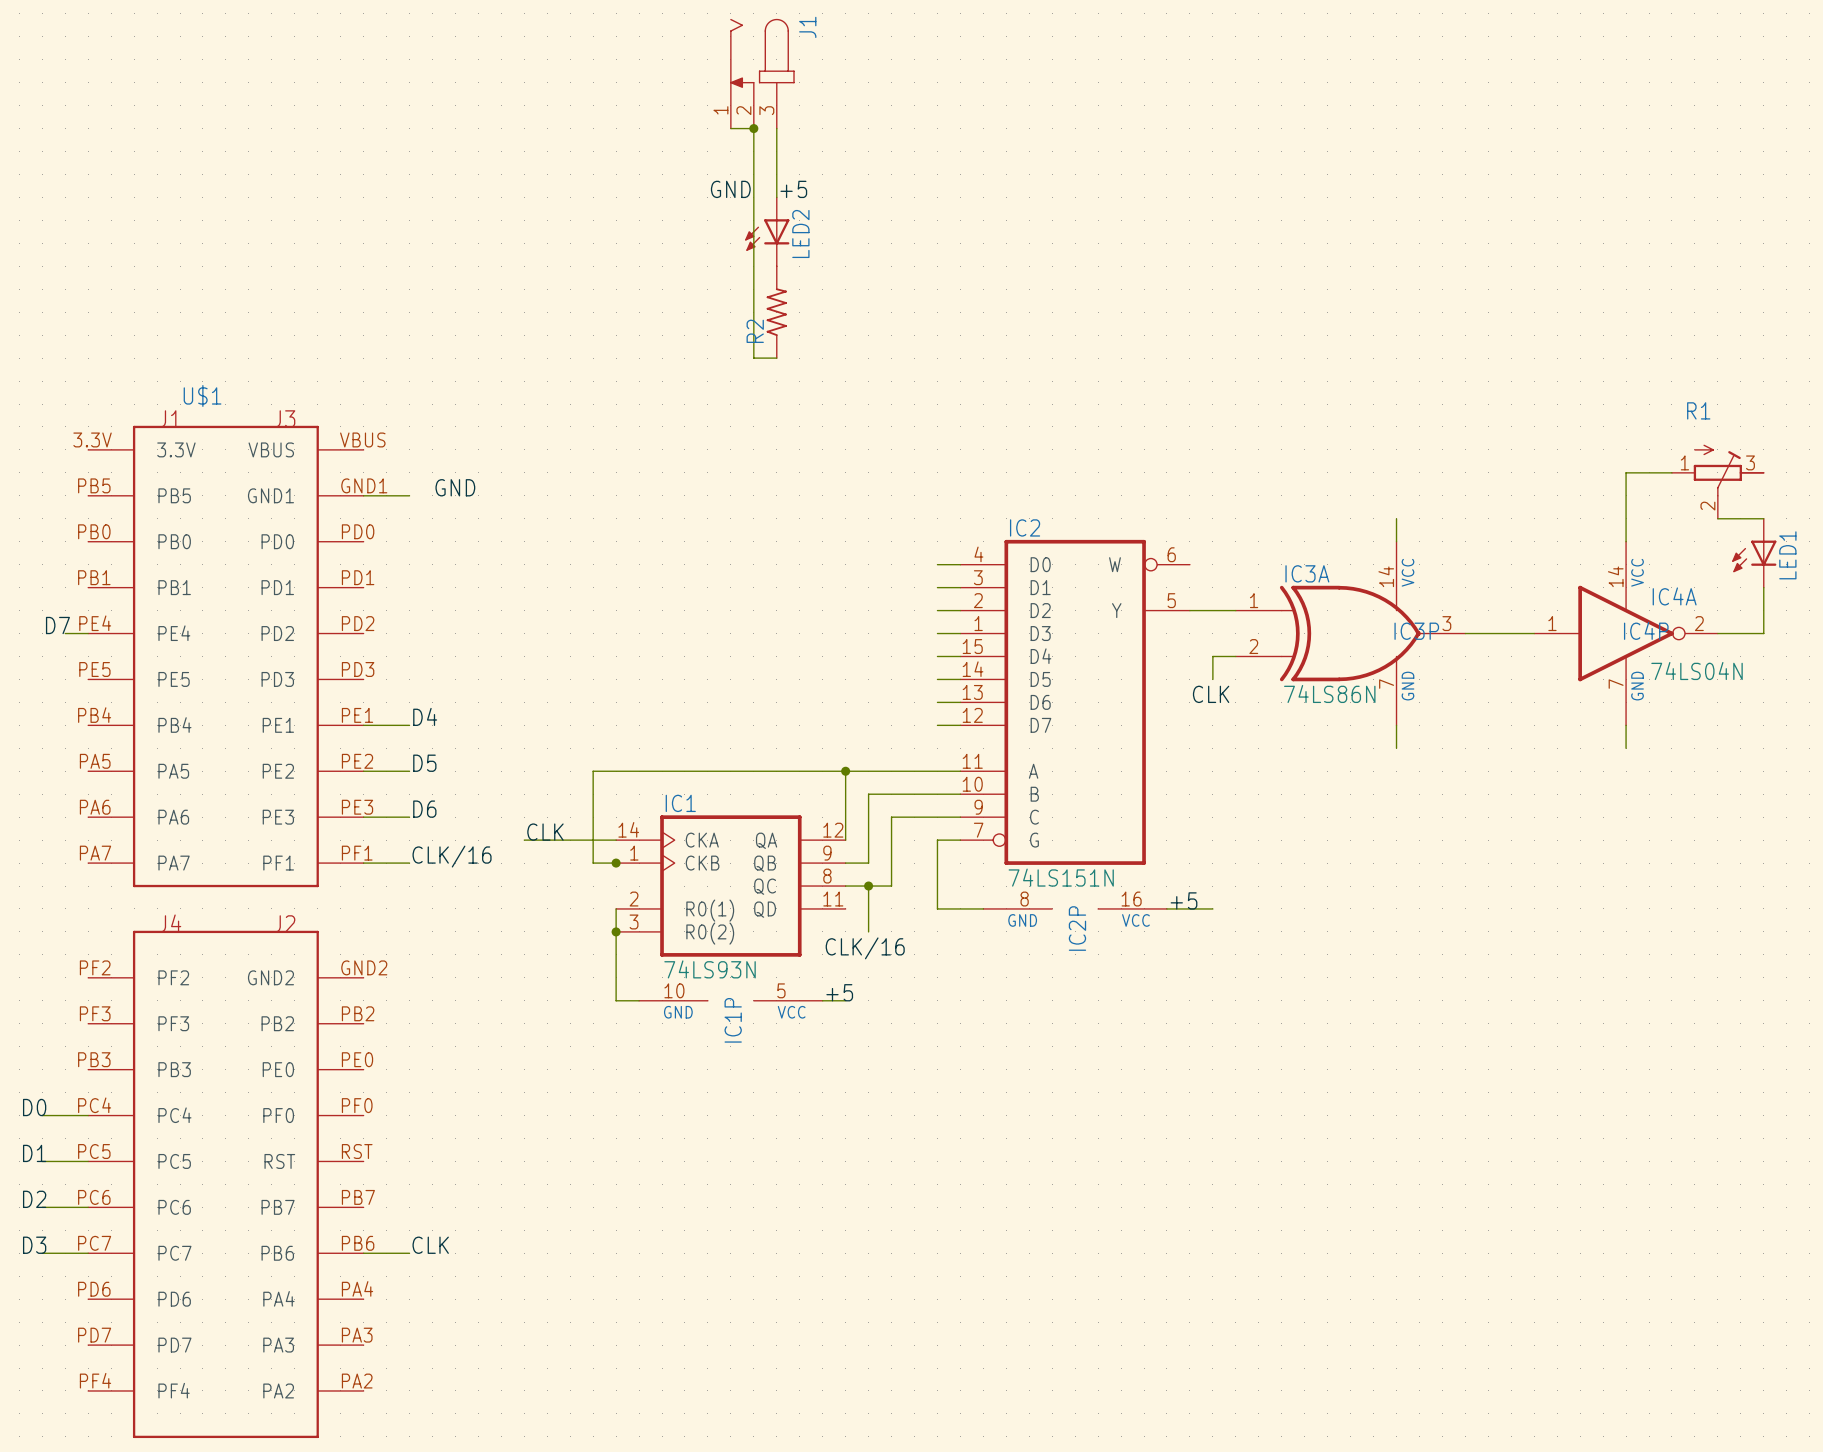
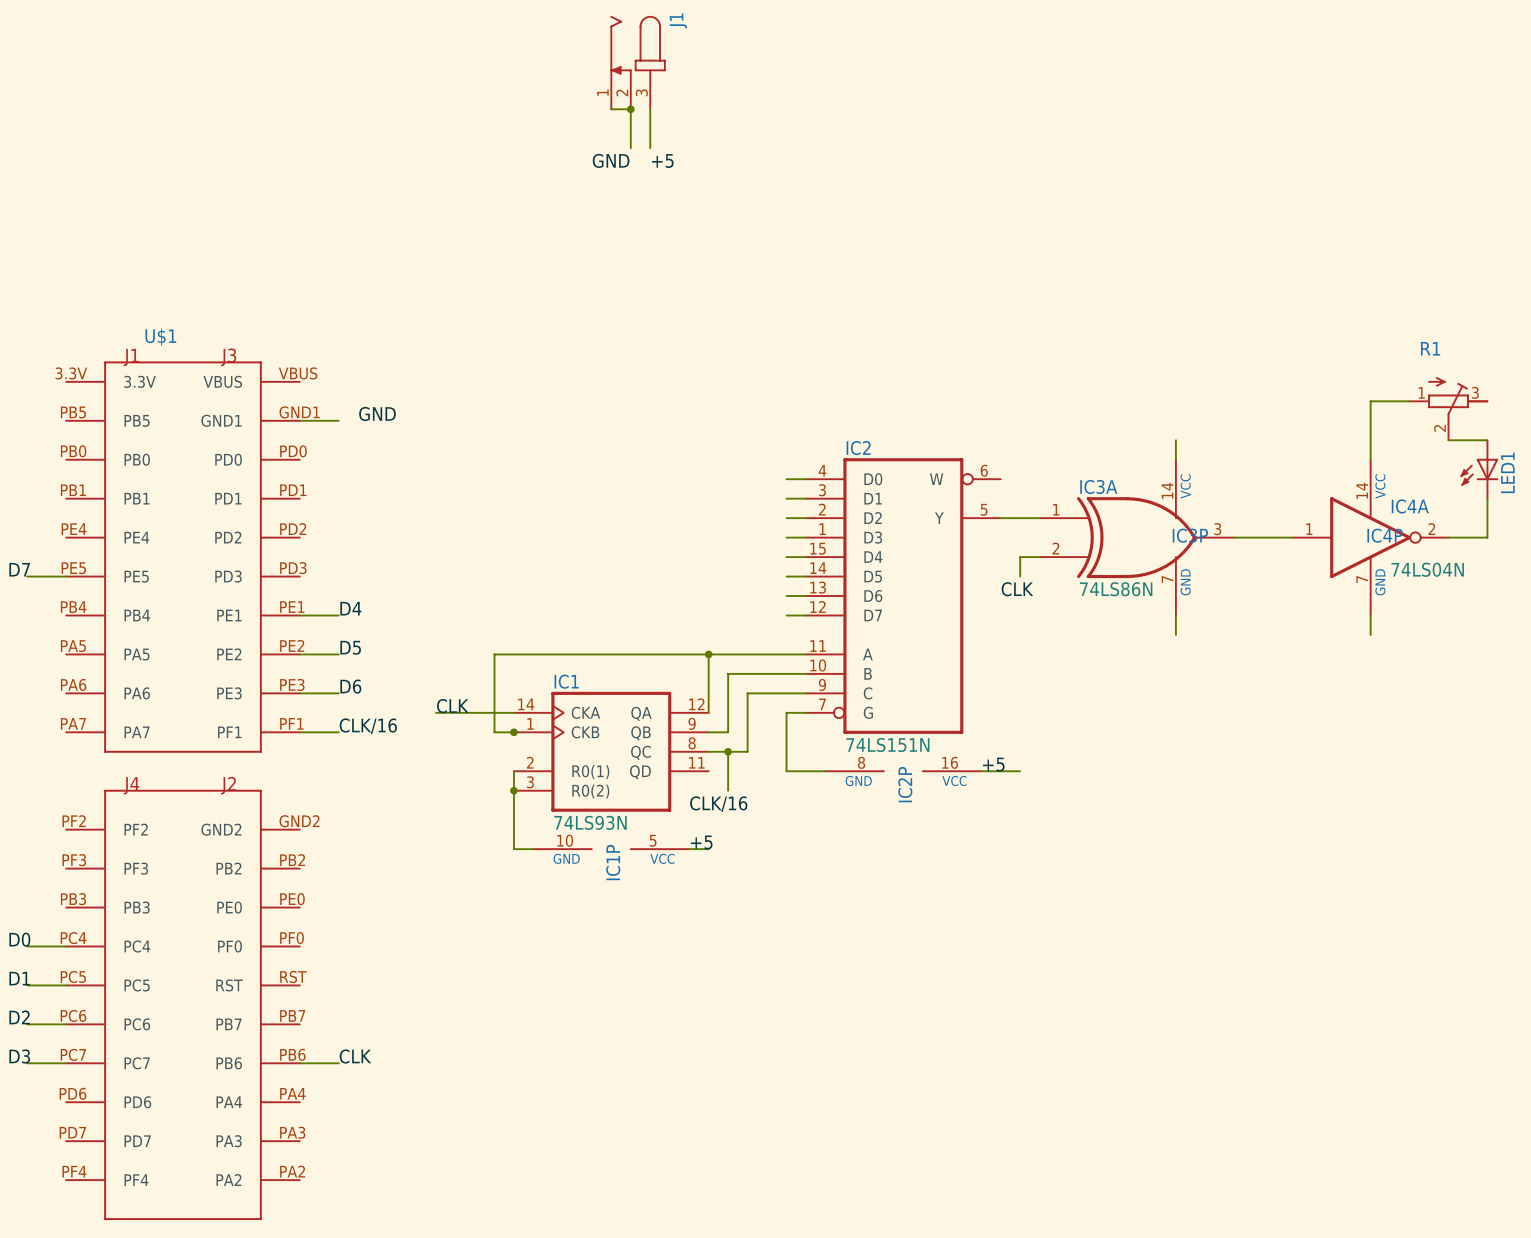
wire: (753, 174) (753, 358) (776, 358) -> none
wire: (776, 174) (776, 197) -> none
LED2: (767, 231) -> none
R2: (776, 312) -> none
label position: D7 (57, 625) -> D7 (19, 569)
wire: (65, 633) (88, 633) -> none
wire: none -> (27, 576) (66, 576)

